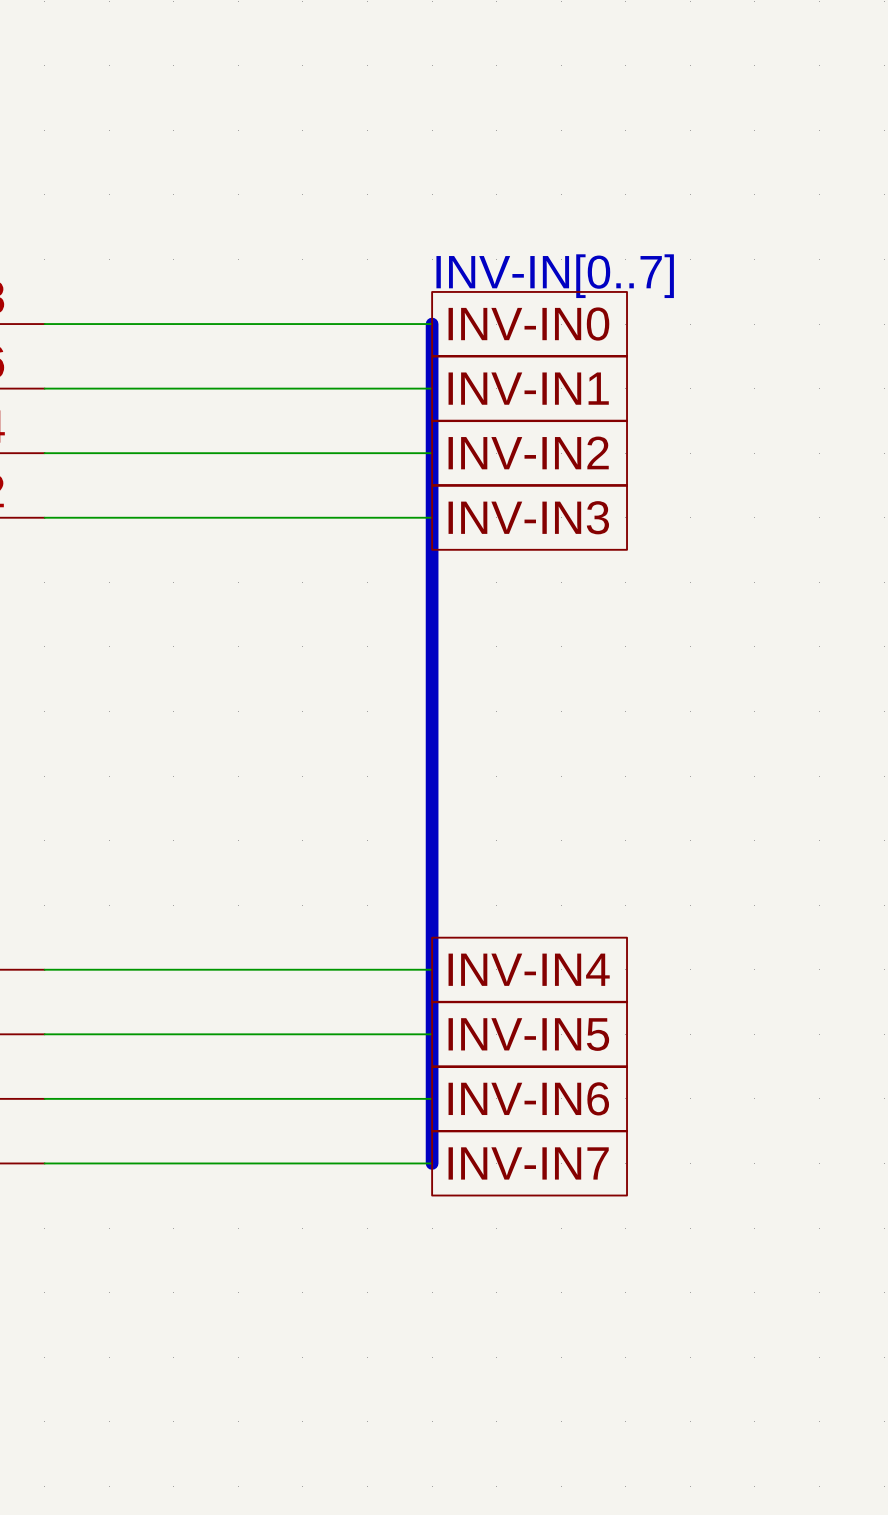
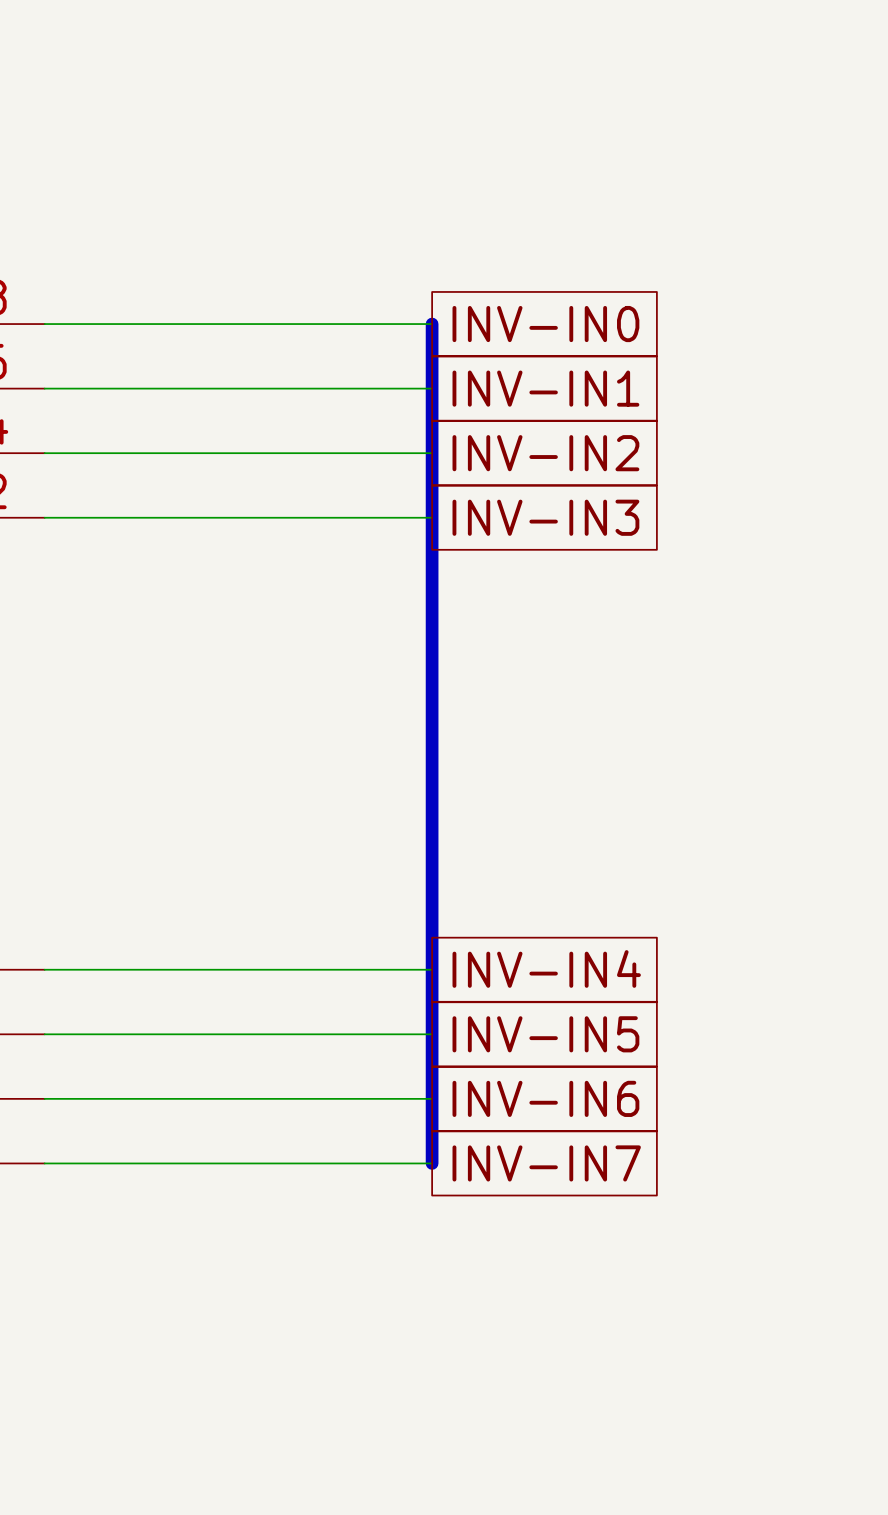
text: INV-IN[0..7] (555, 276) -> none

